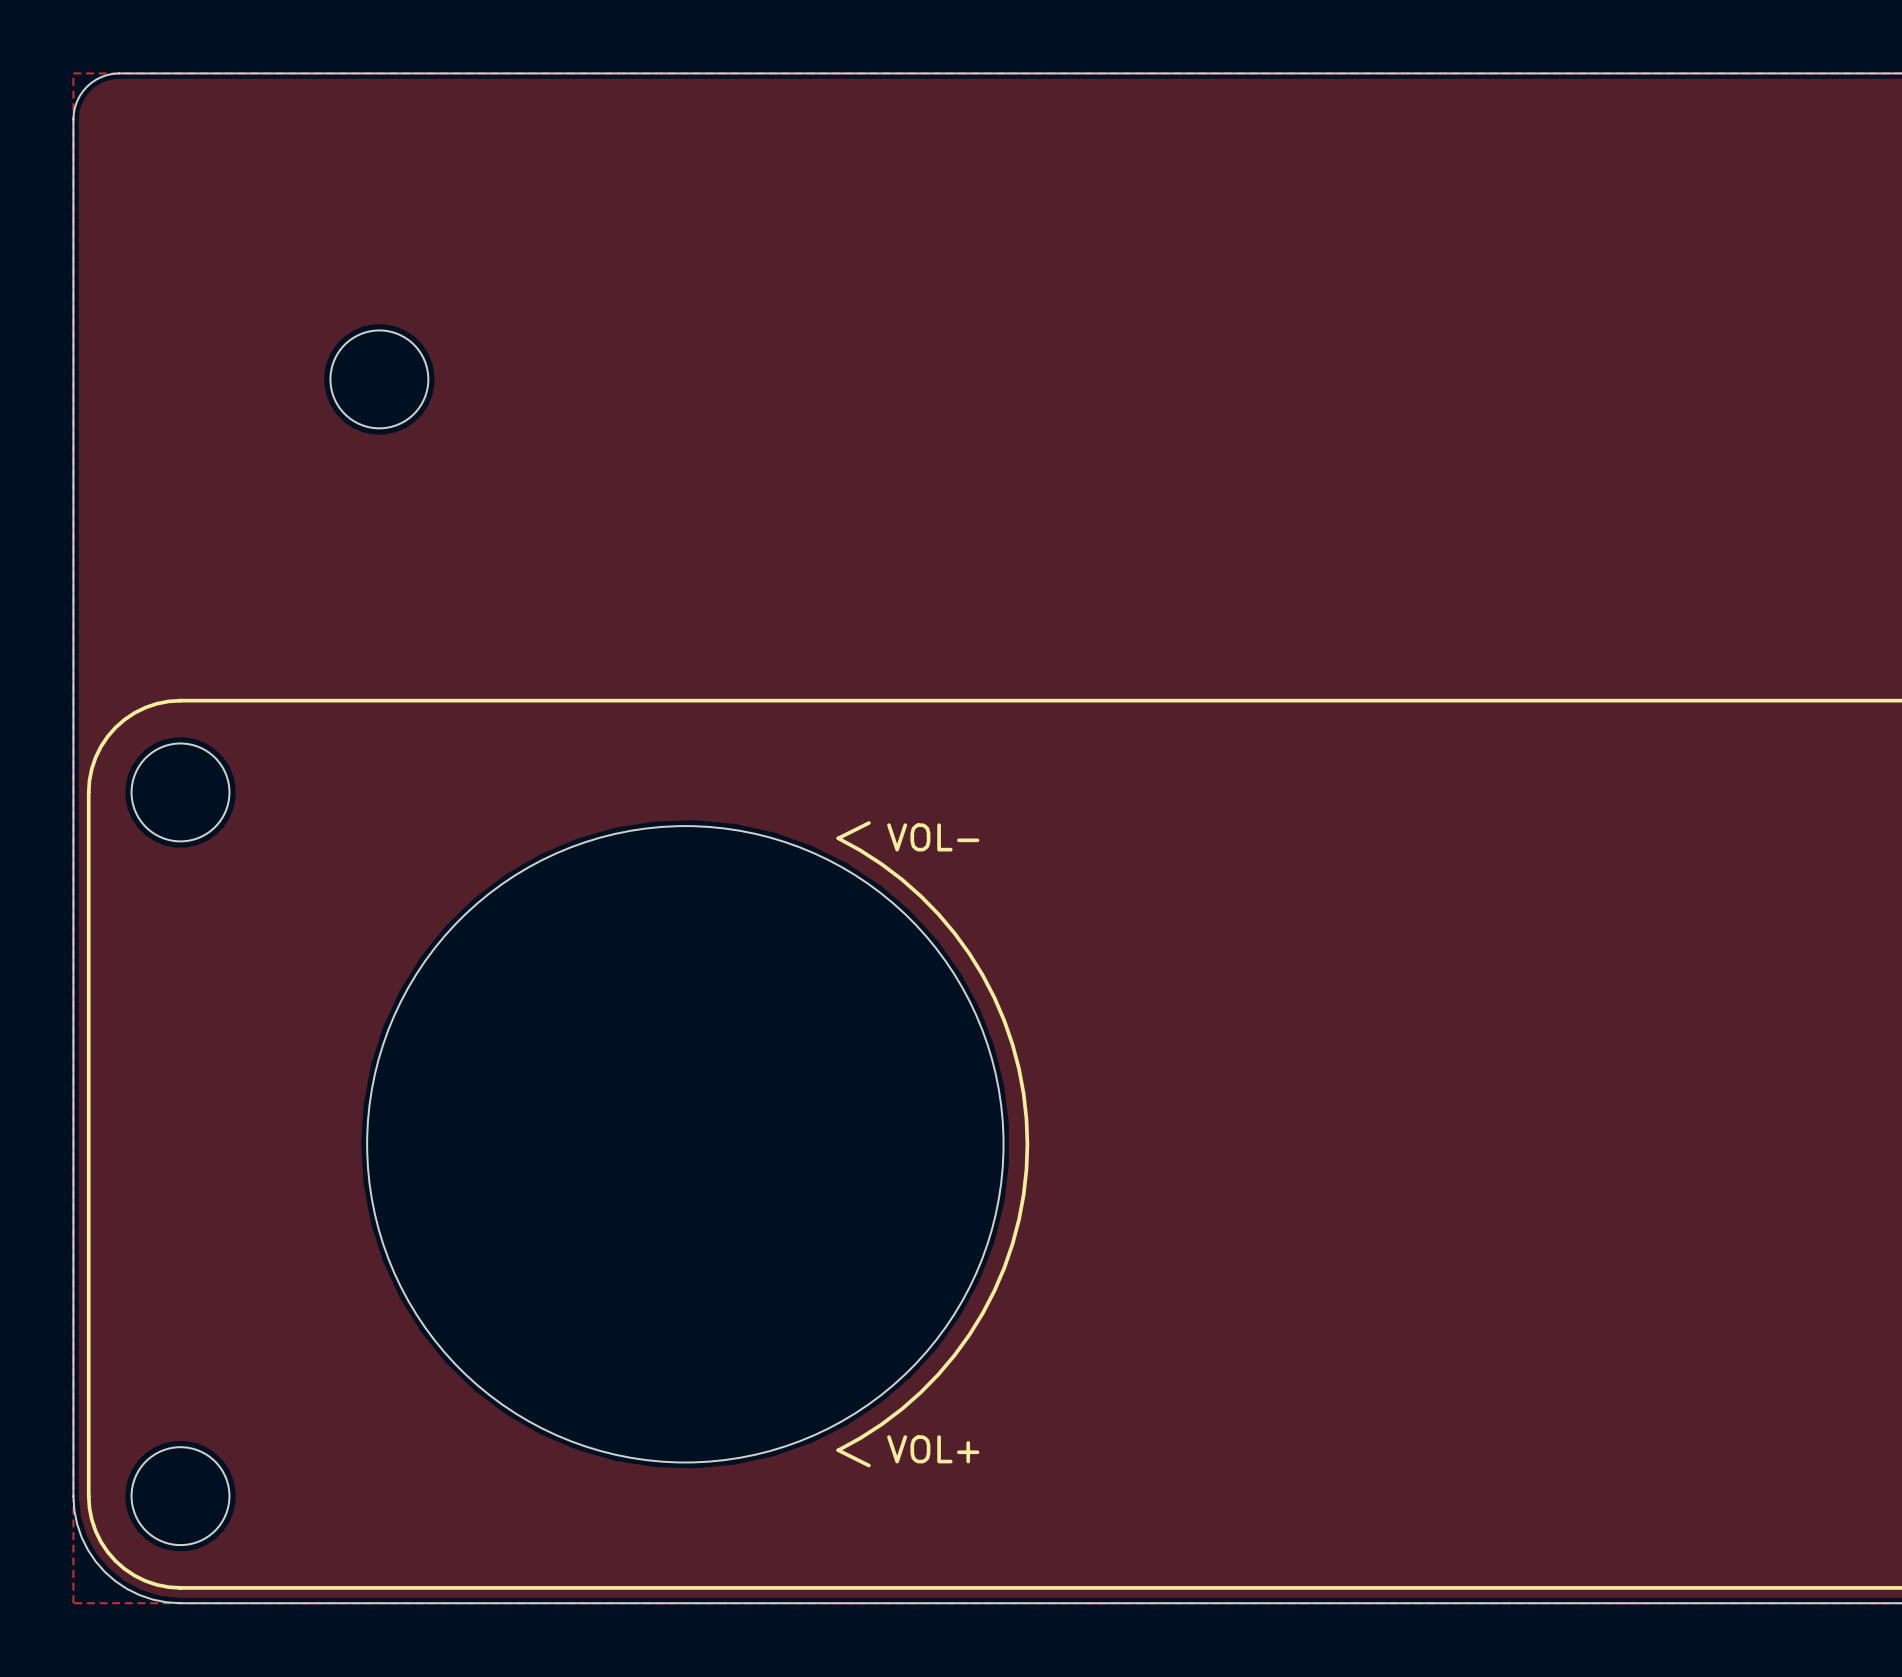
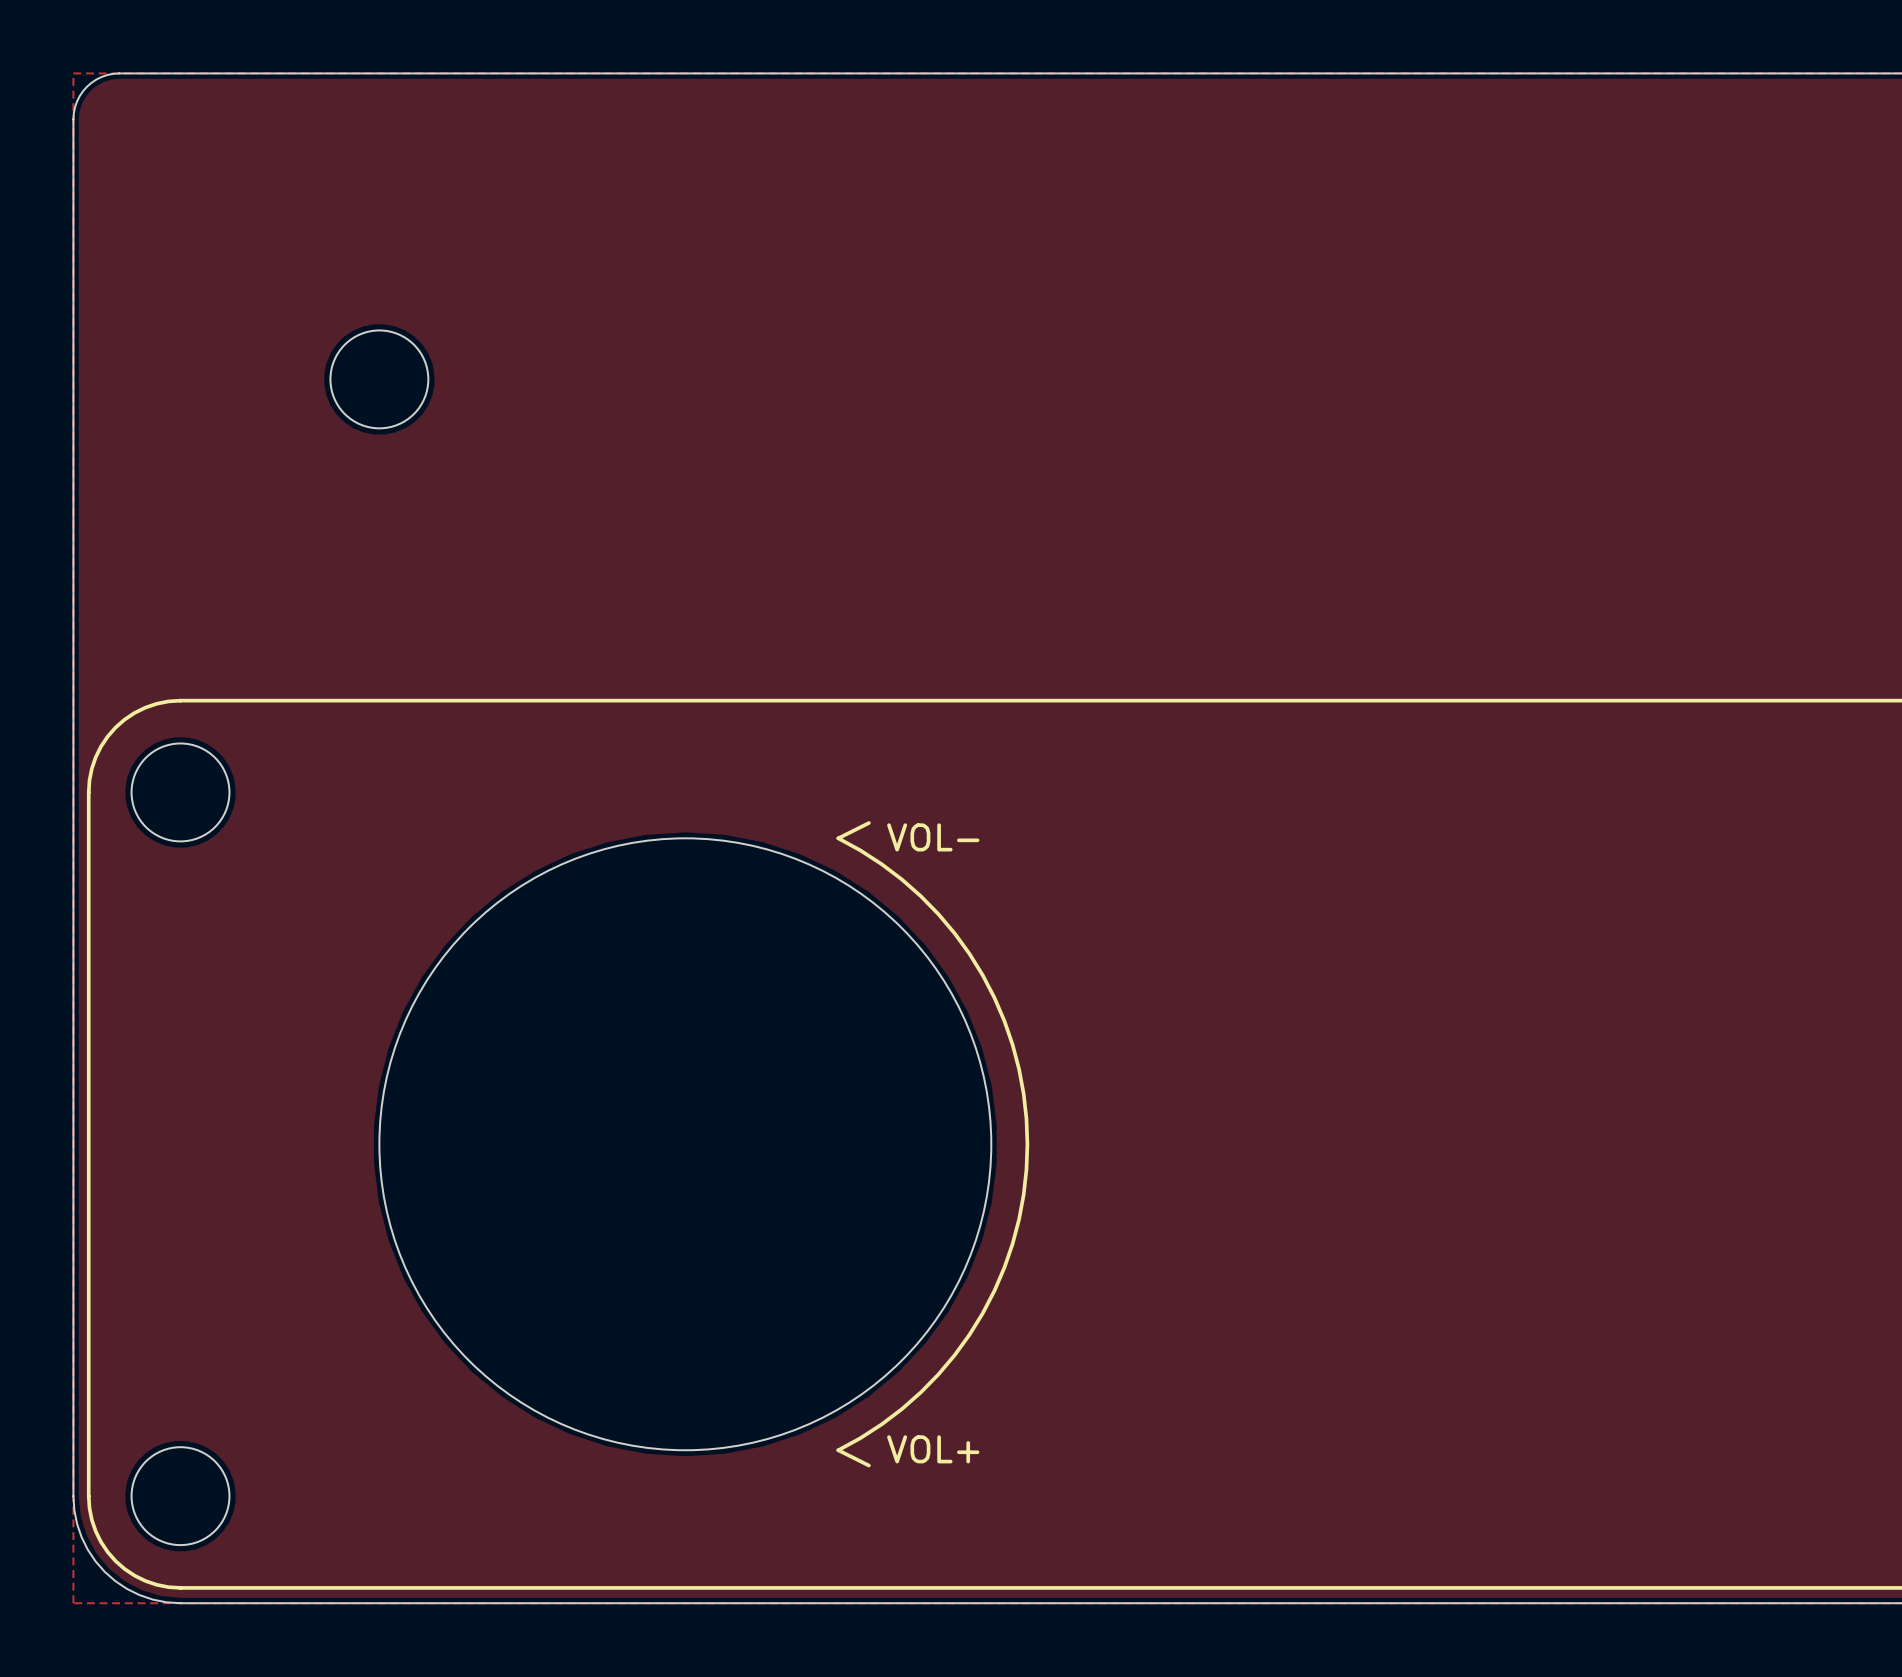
round board edge size: [366, 825, 1005, 1464] -> [378, 837, 993, 1452]

